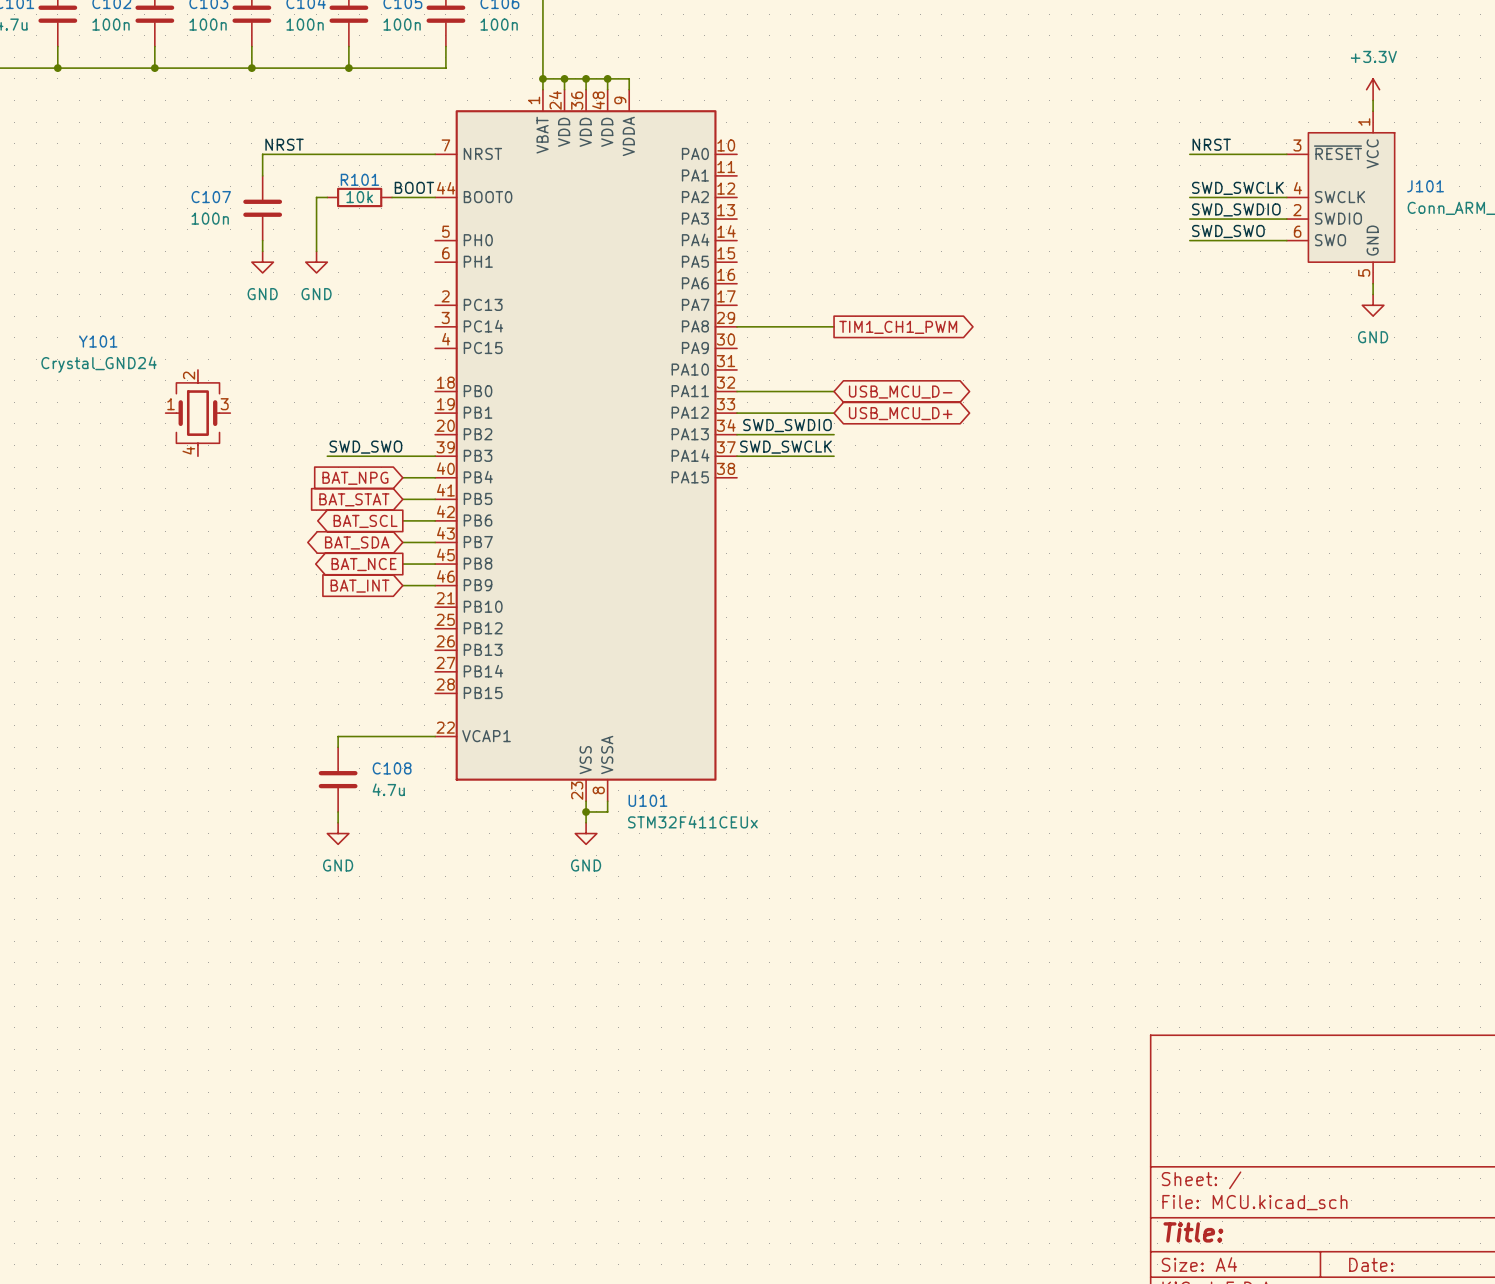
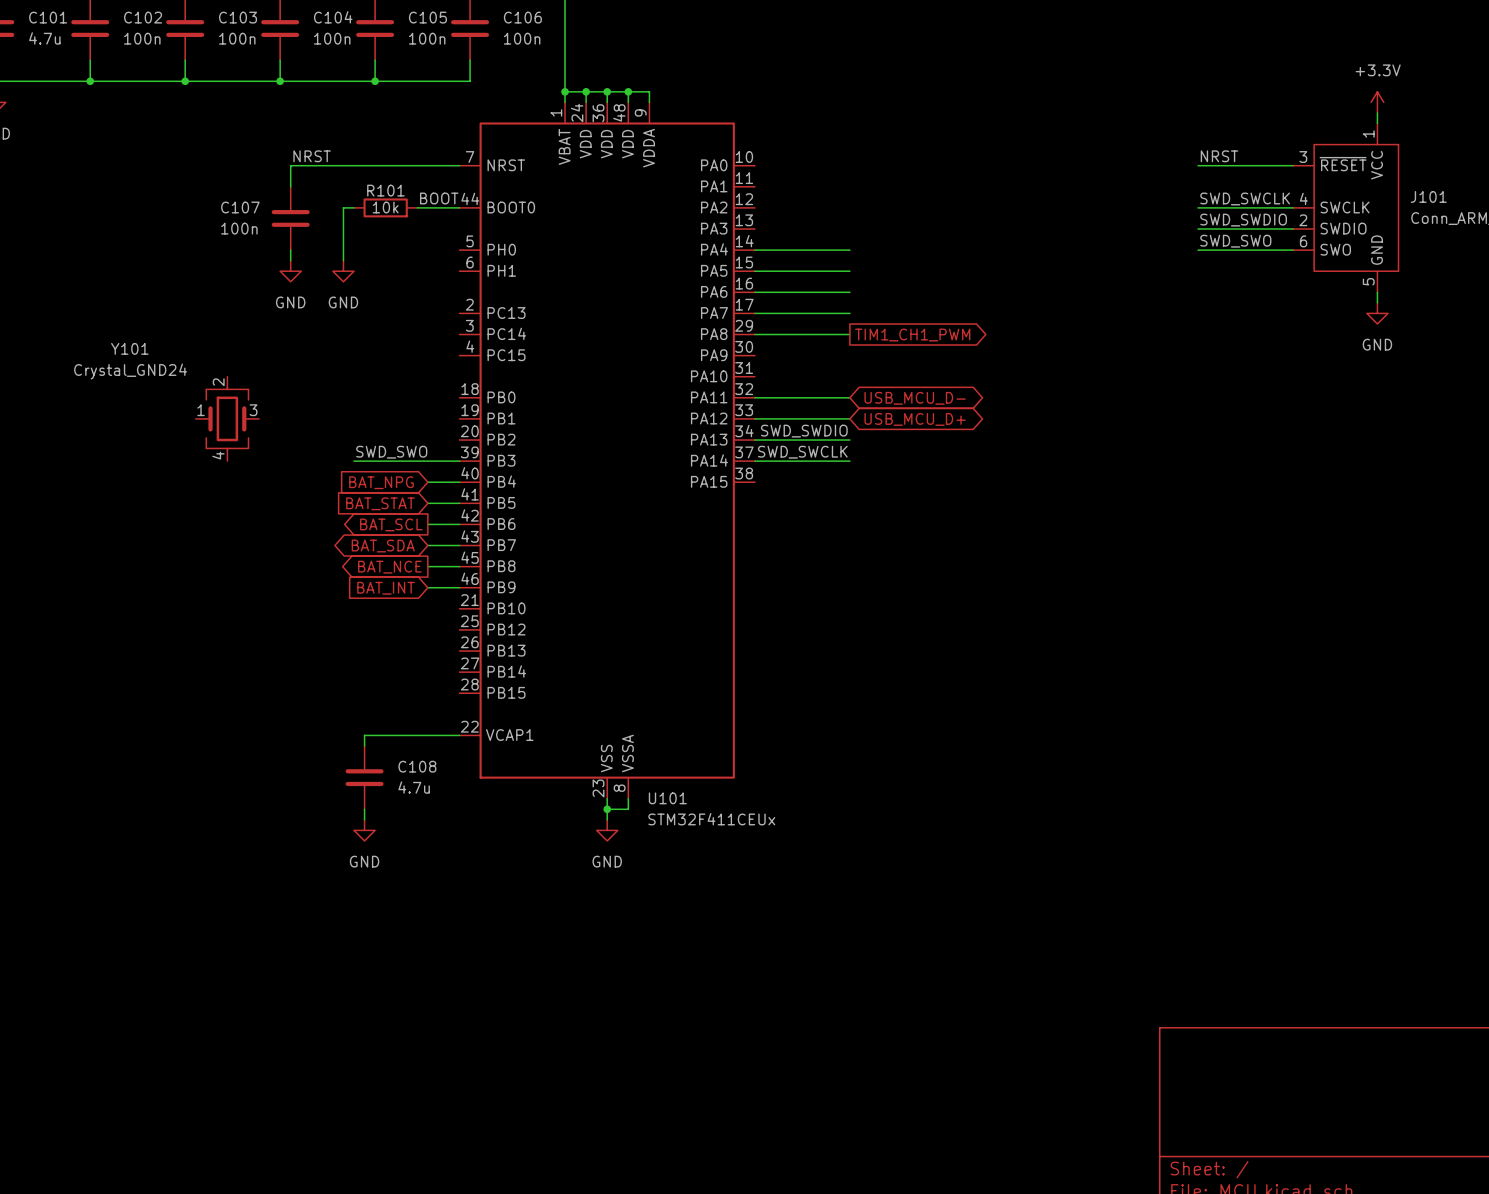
wire: none -> (754, 250) (849, 250)
wire: none -> (754, 271) (849, 271)
wire: none -> (754, 292) (849, 292)
wire: none -> (754, 313) (849, 313)

